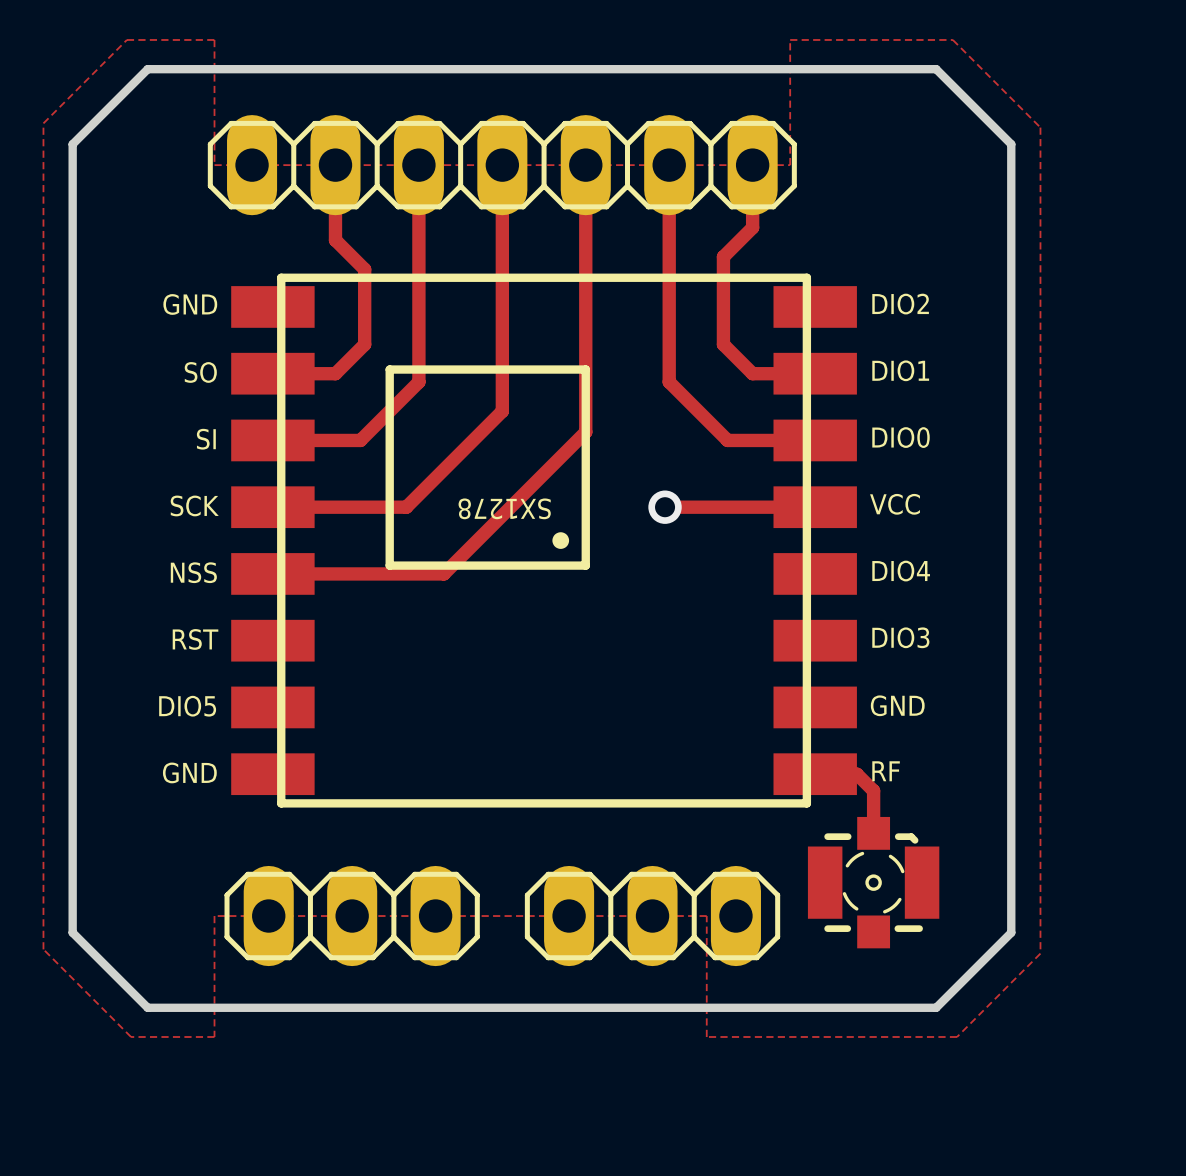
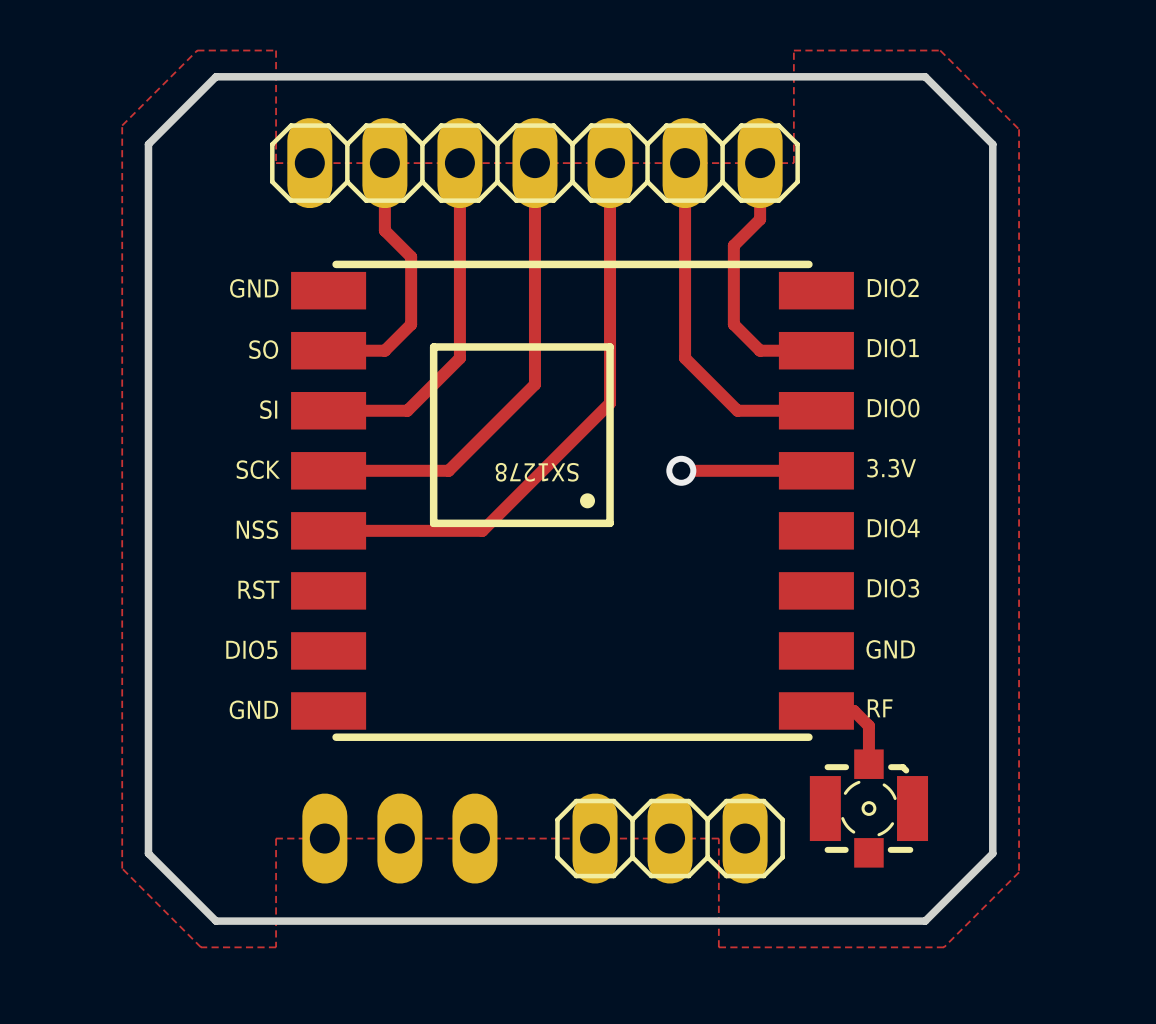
line: (281, 277) (281, 803) -> none
line: (806, 277) (806, 803) -> none
VCC name: VCC (895, 504) -> 3.3V (891, 468)
part side: top (352, 916) -> bottom (399, 838)

